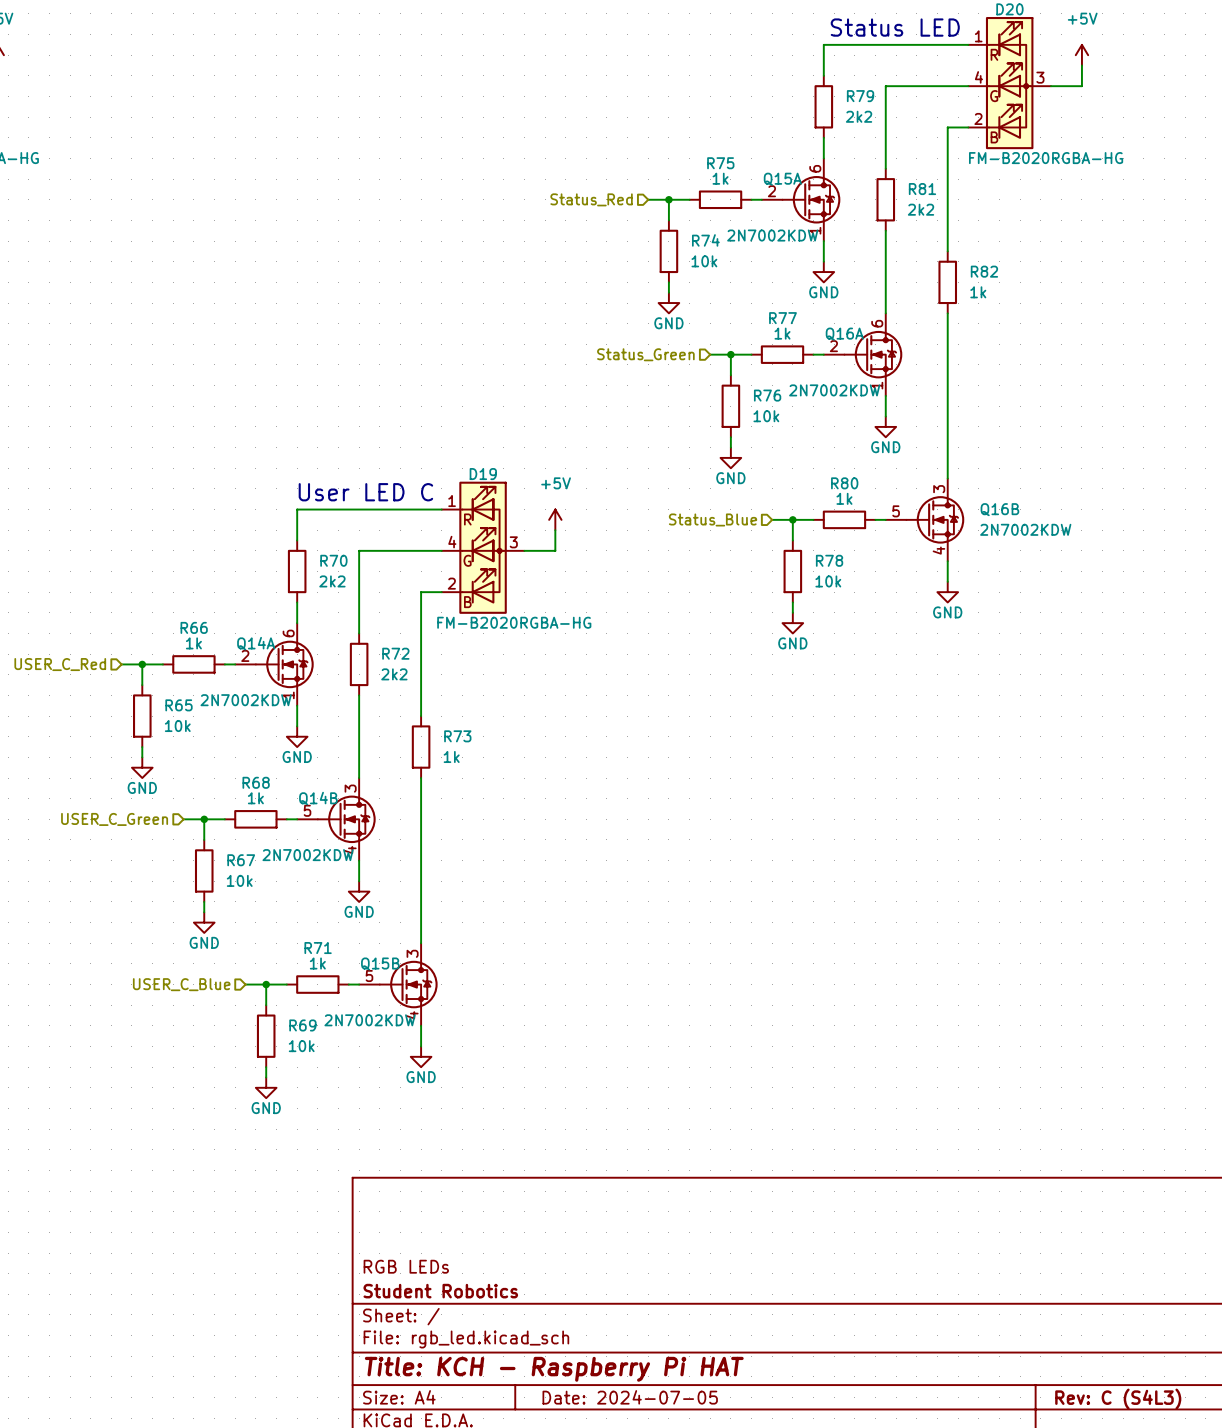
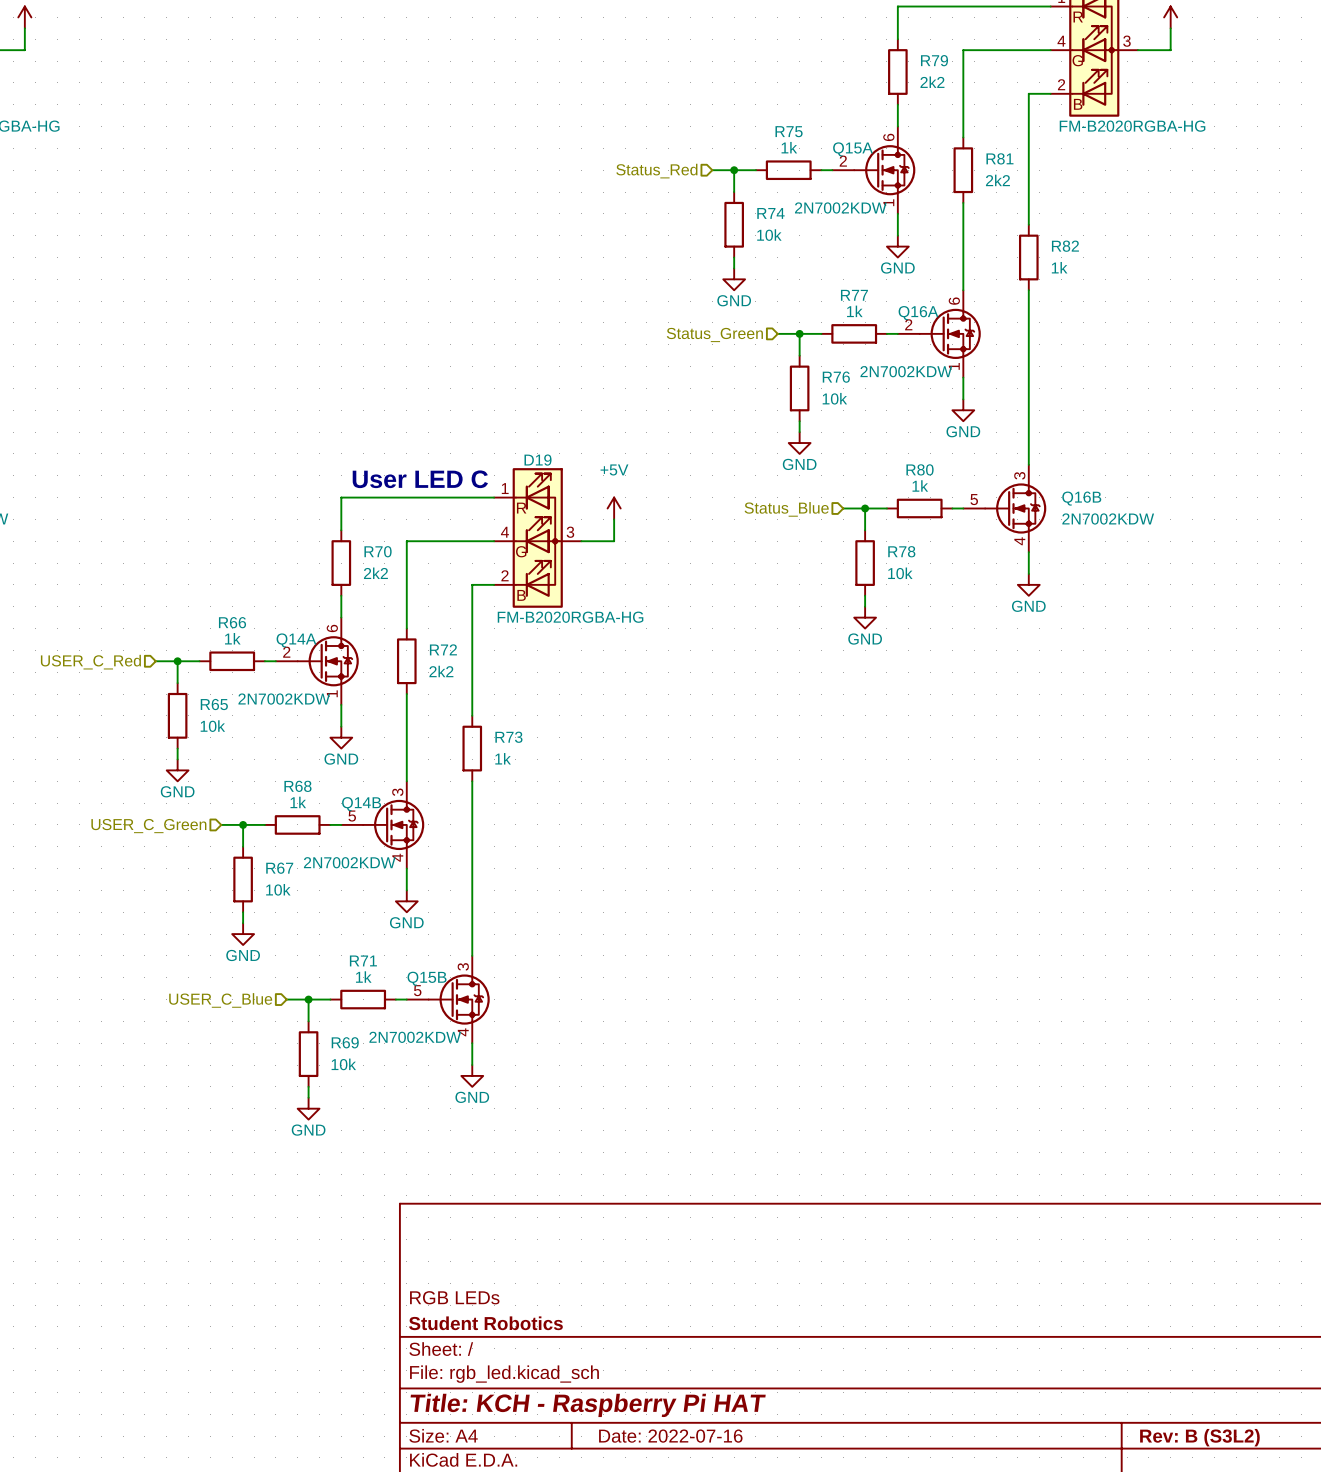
title block: Date: 2024-07-05 (630, 1397) -> Date: 2022-07-16 (670, 1436)
title block: Rev: C (S4L3) (1118, 1399) -> Rev: B (S3L2) (1199, 1437)

